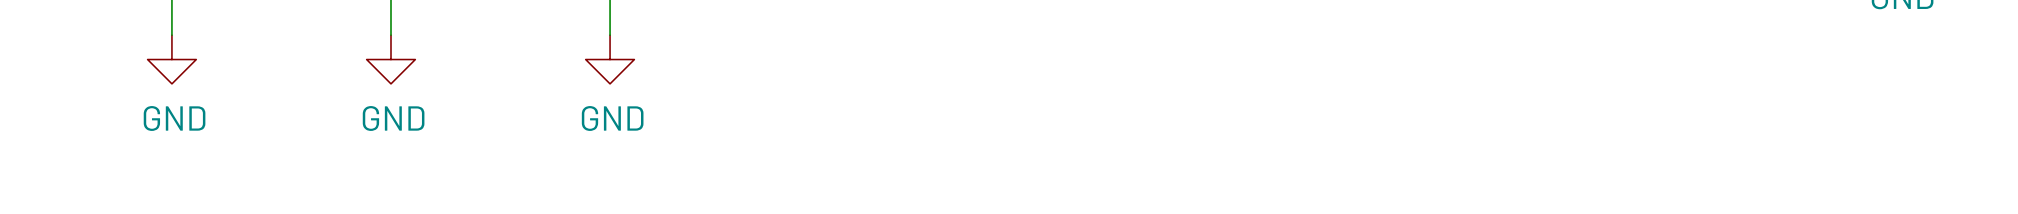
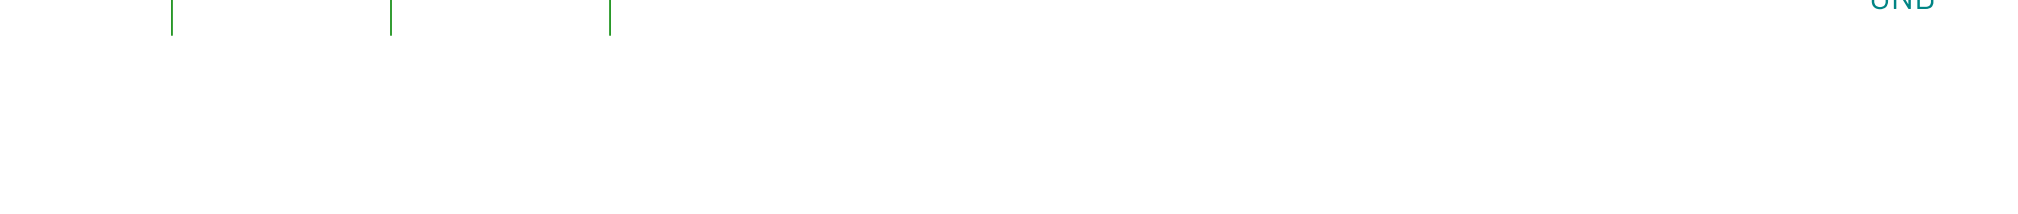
power symbol: GND (171, 59) -> none
power symbol: GND (390, 59) -> none
power symbol: GND (610, 59) -> none

